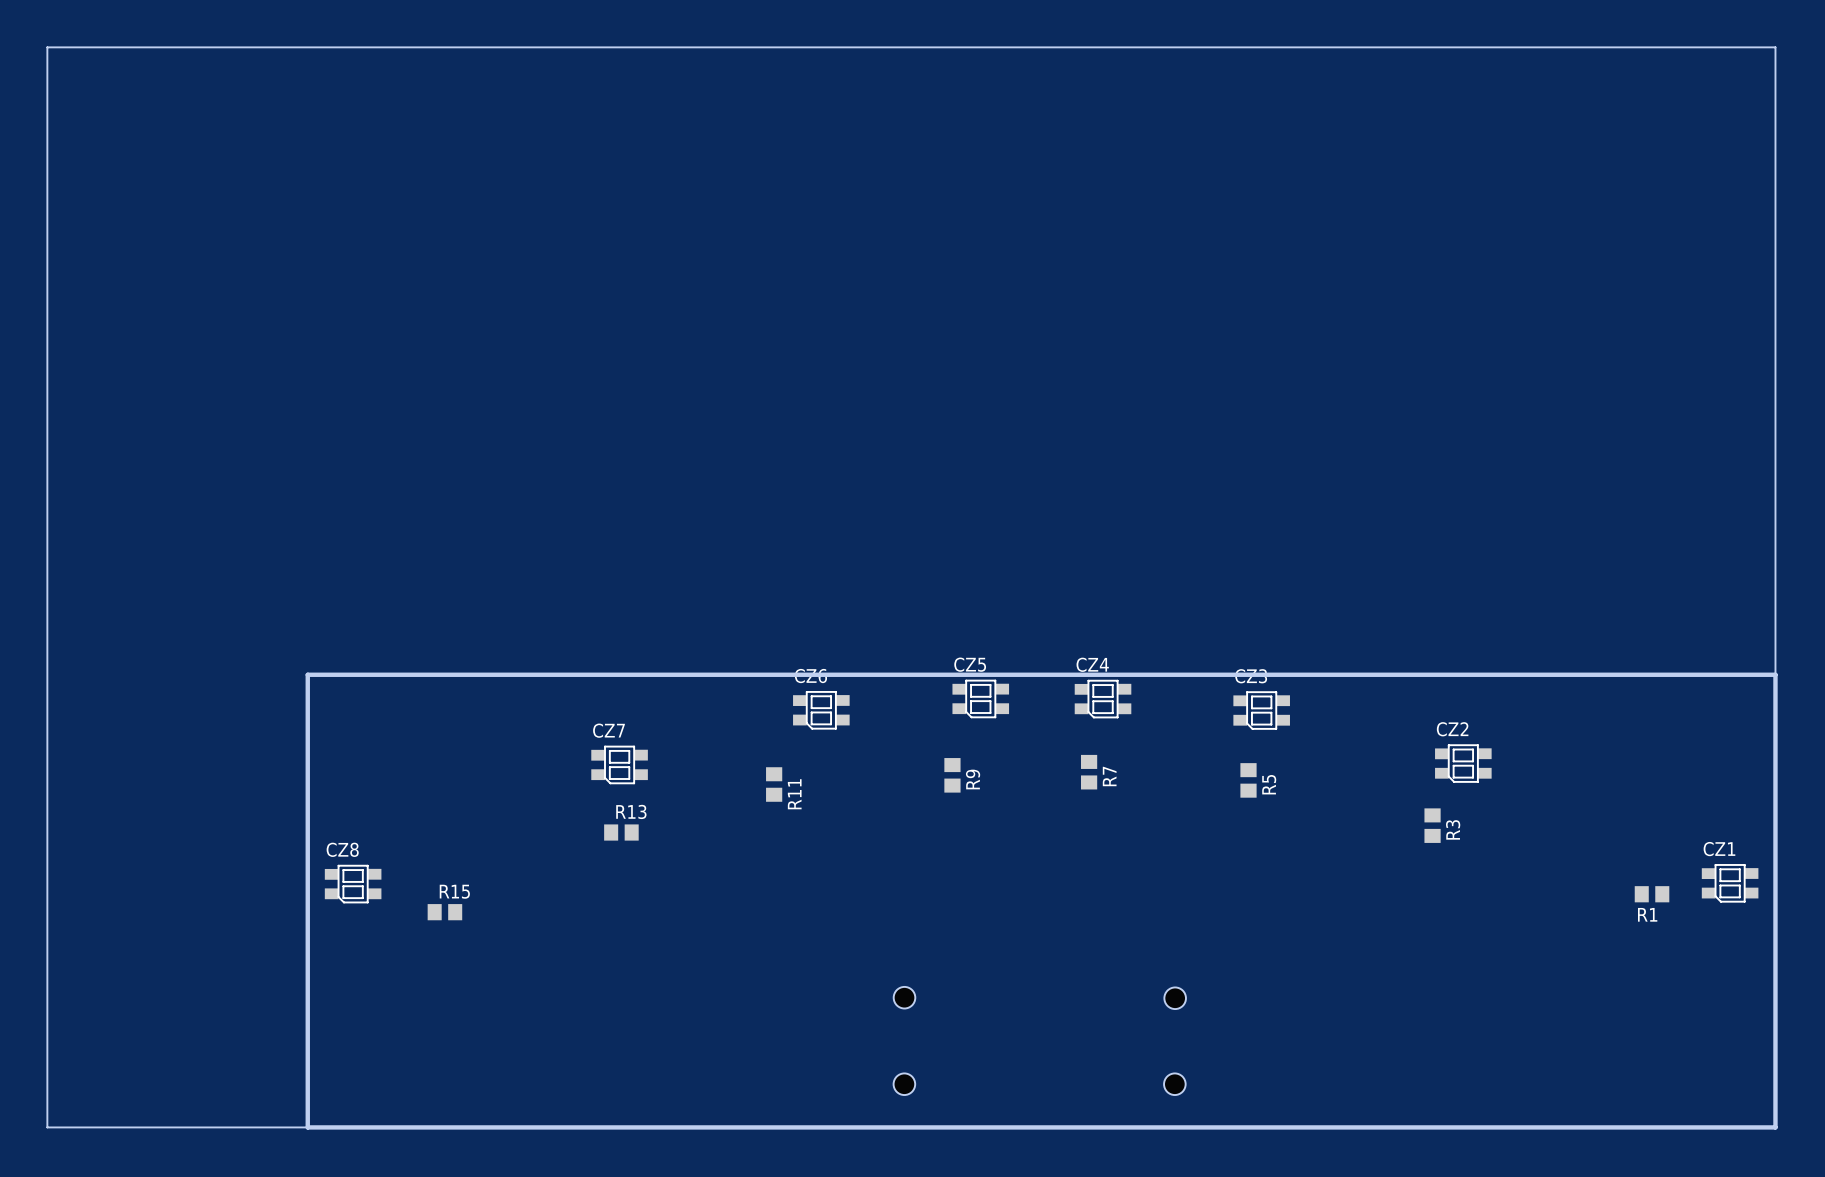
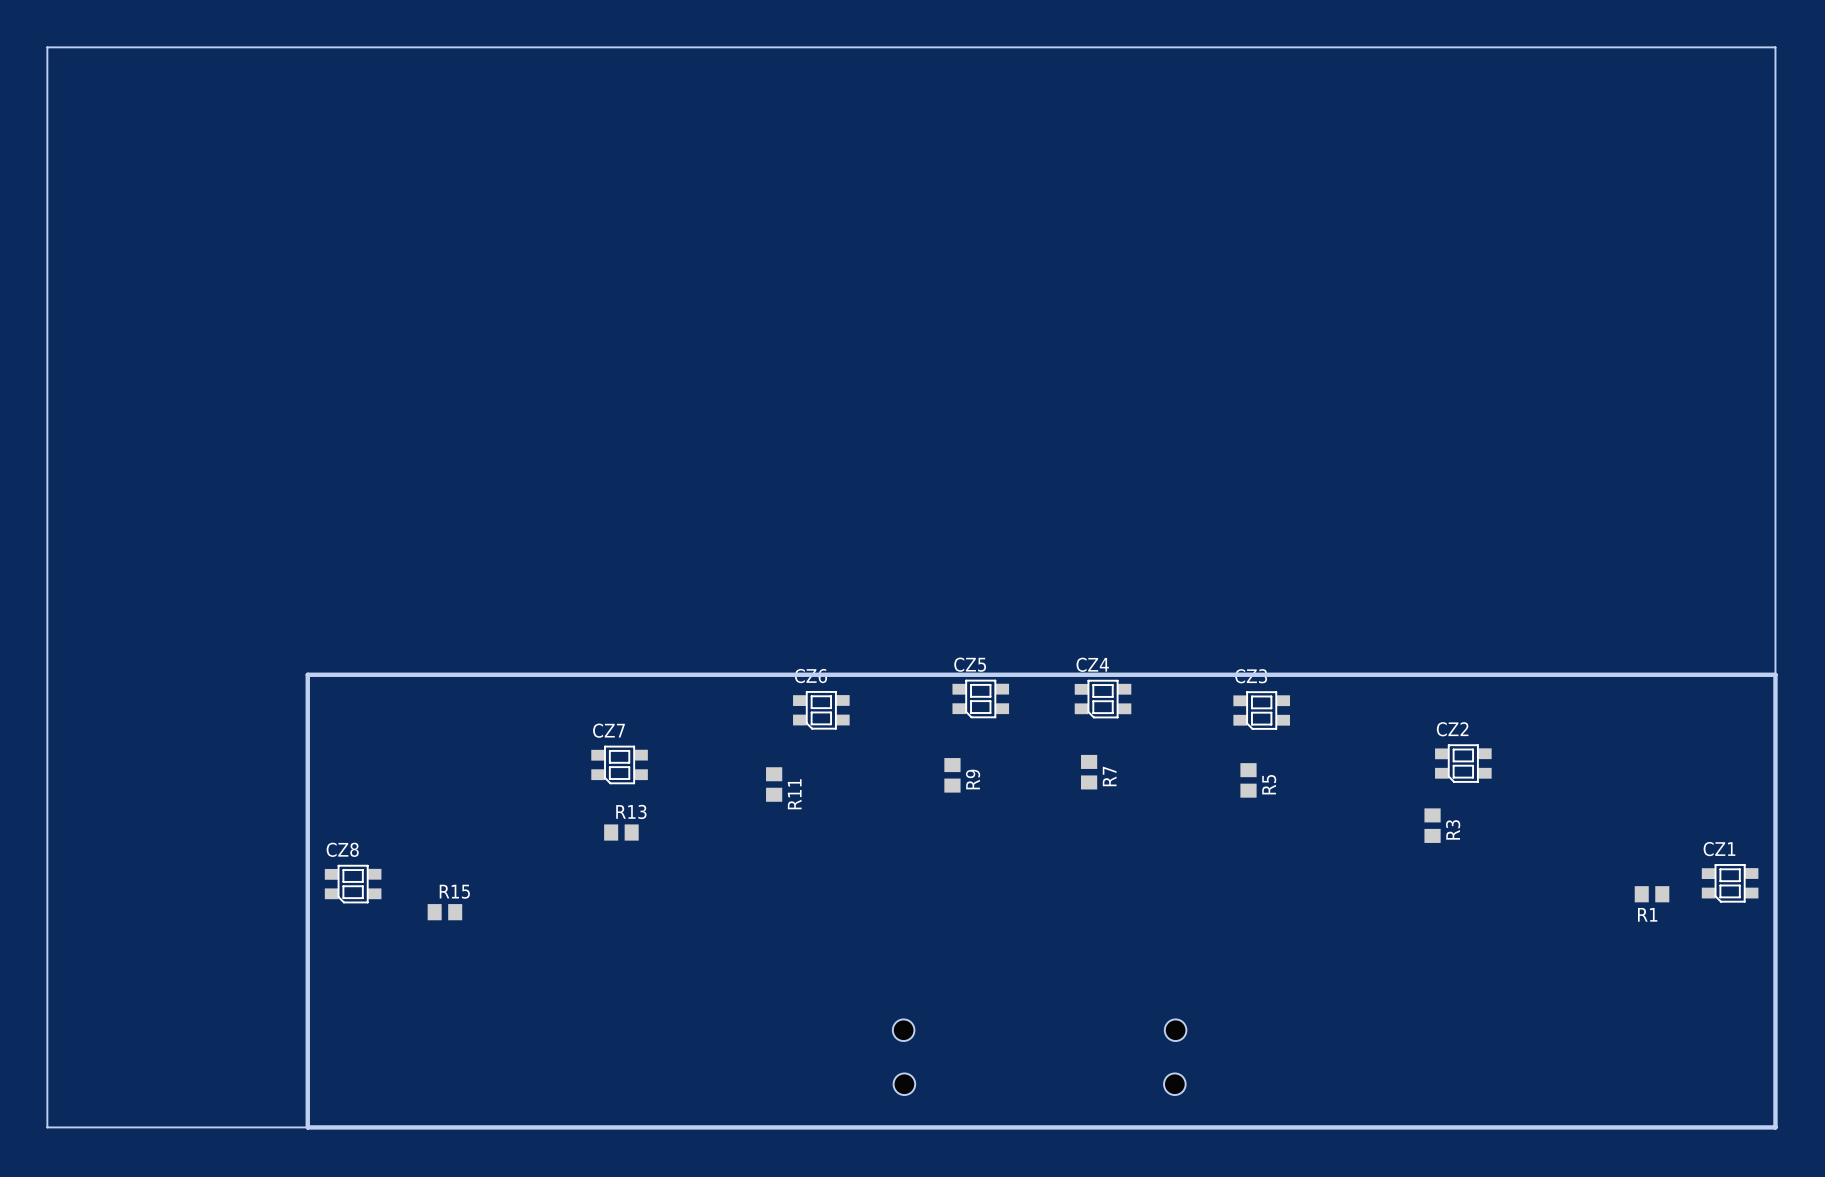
hole position: (904, 997) -> (903, 1030)
hole position: (1175, 998) -> (1175, 1030)

